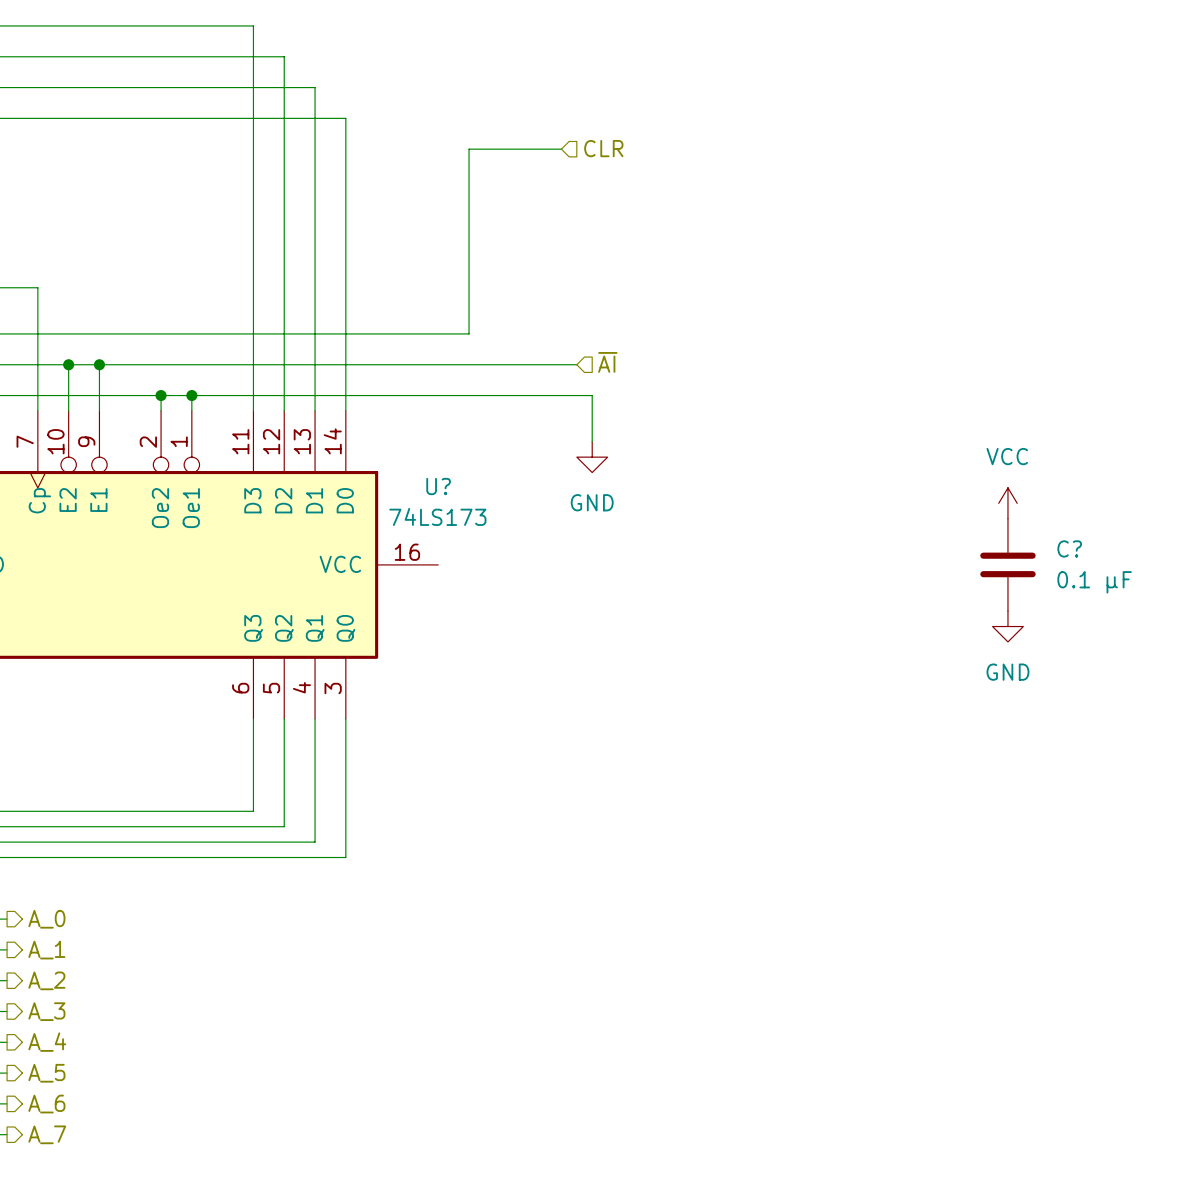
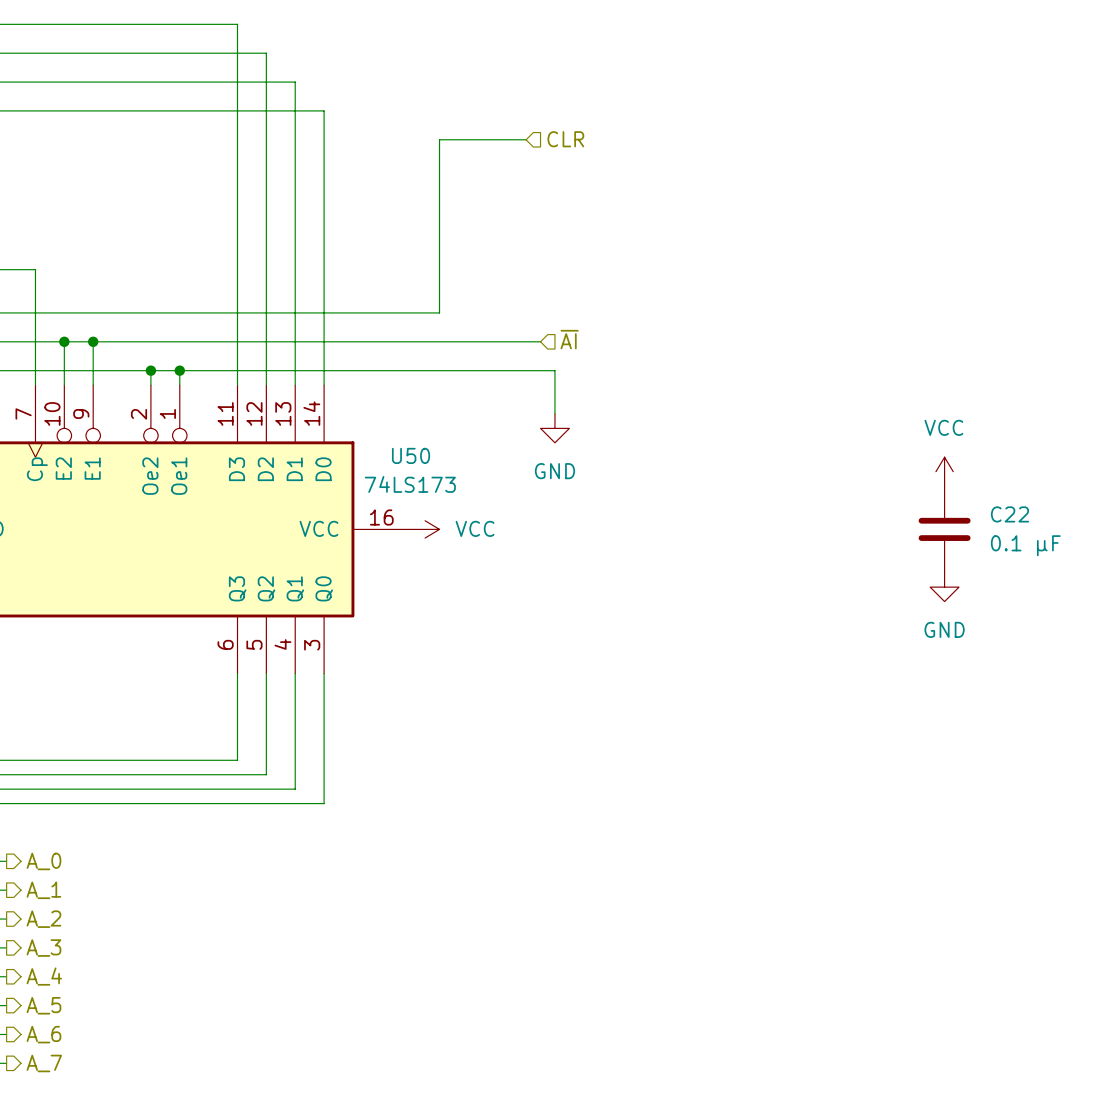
U? name: U? (438, 486) -> U50 (411, 455)
C? name: C? (1069, 548) -> C22 (1009, 514)
power symbol: none -> VCC (425, 529)

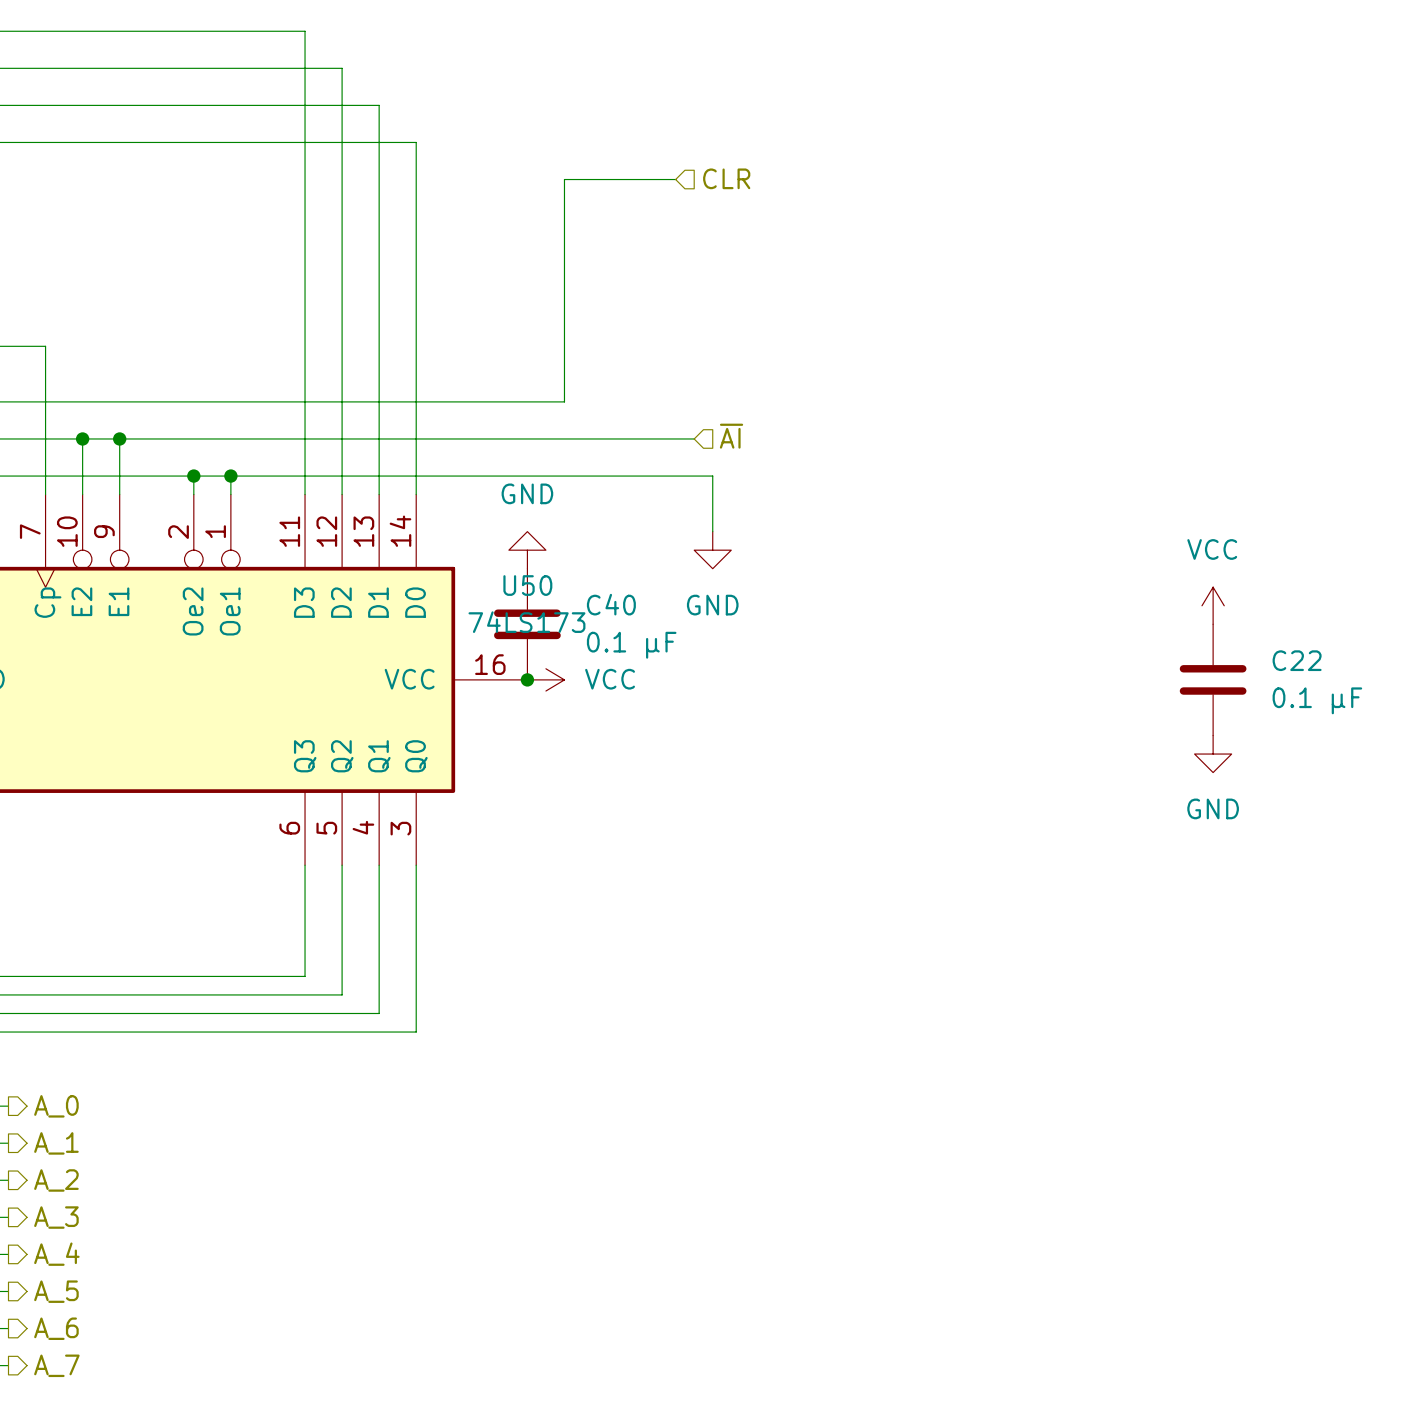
power symbol: none -> GND (527, 550)
C40: none -> 0.1 µF (527, 624)
junction: none -> (527, 679)

